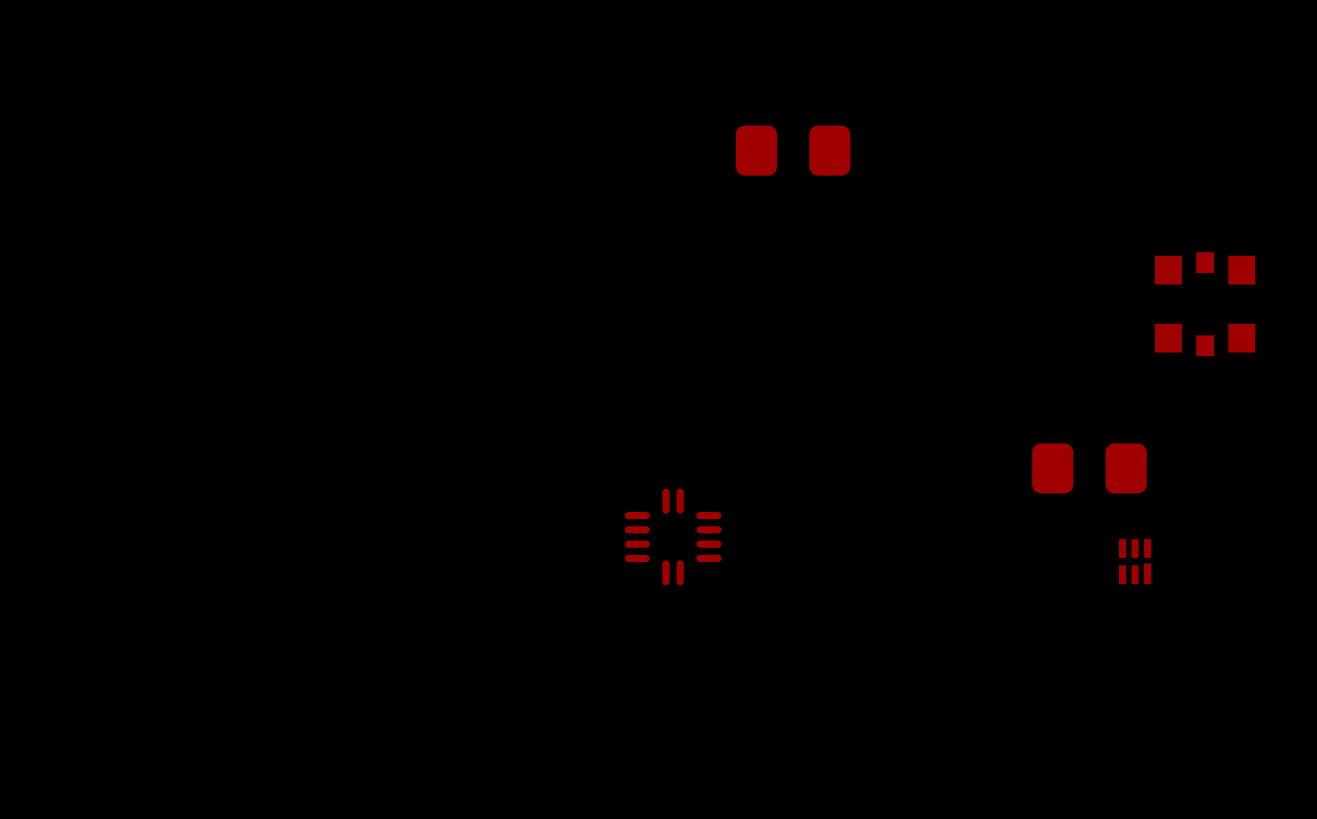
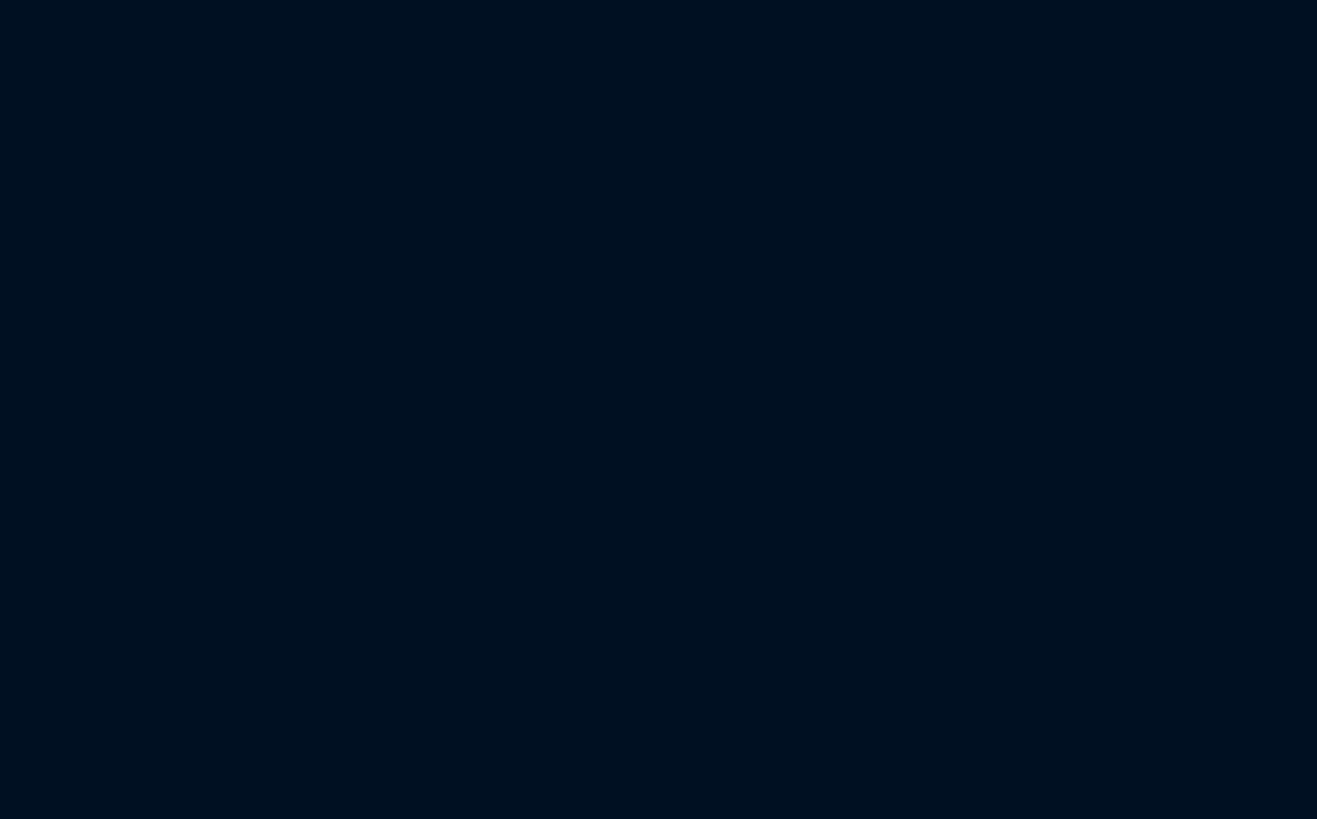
part: (793, 150) -> none
part: (1205, 304) -> none
part: (1089, 468) -> none
part: (673, 536) -> none
part: (1135, 561) -> none

